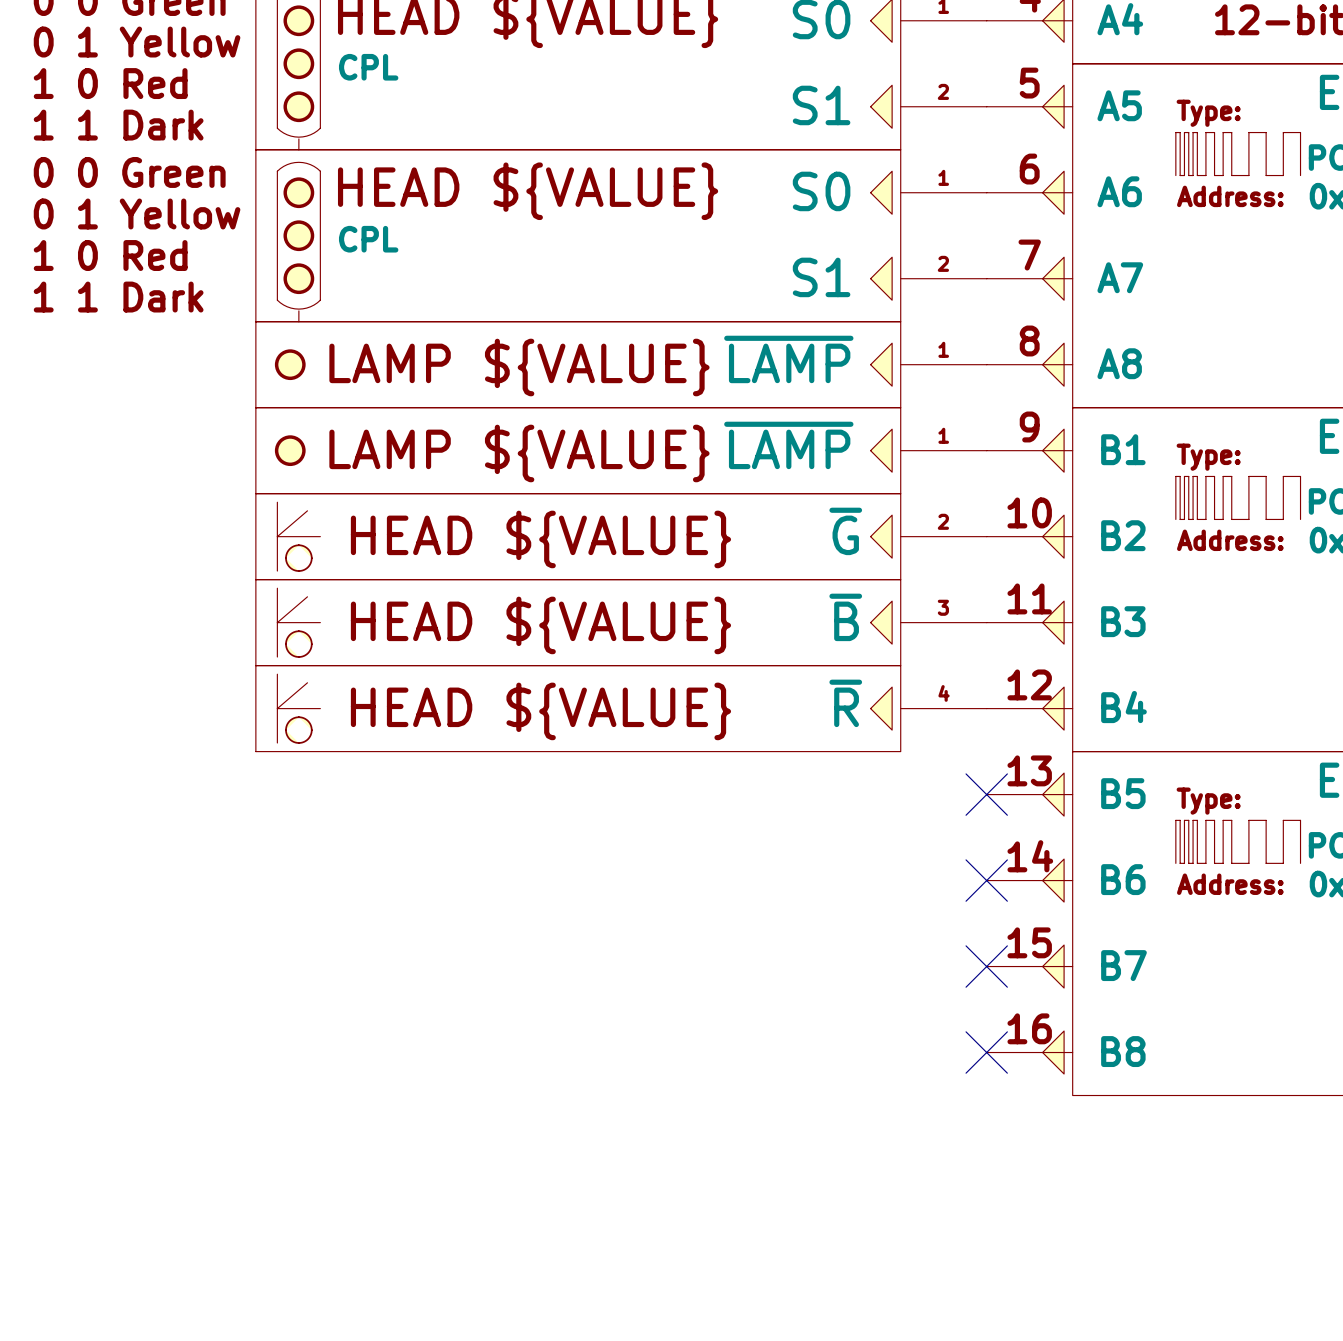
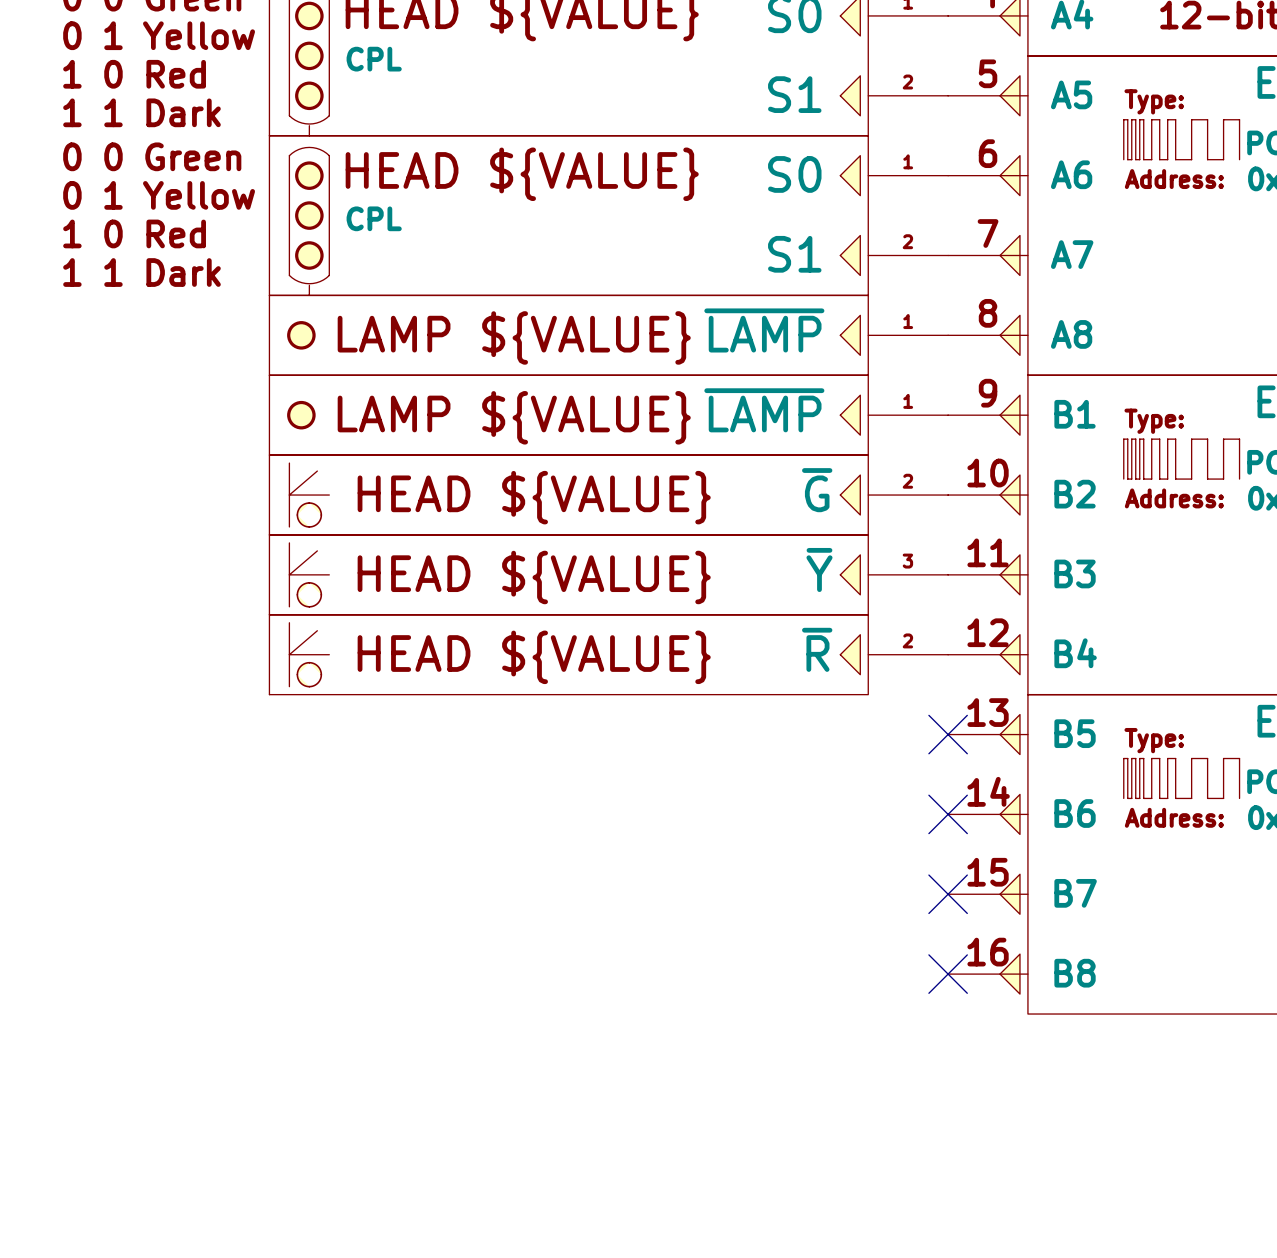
part pin name: ~{B} (845, 617) -> ~{Y} (819, 570)
part pin number: 4 (944, 693) -> 2 (907, 640)

